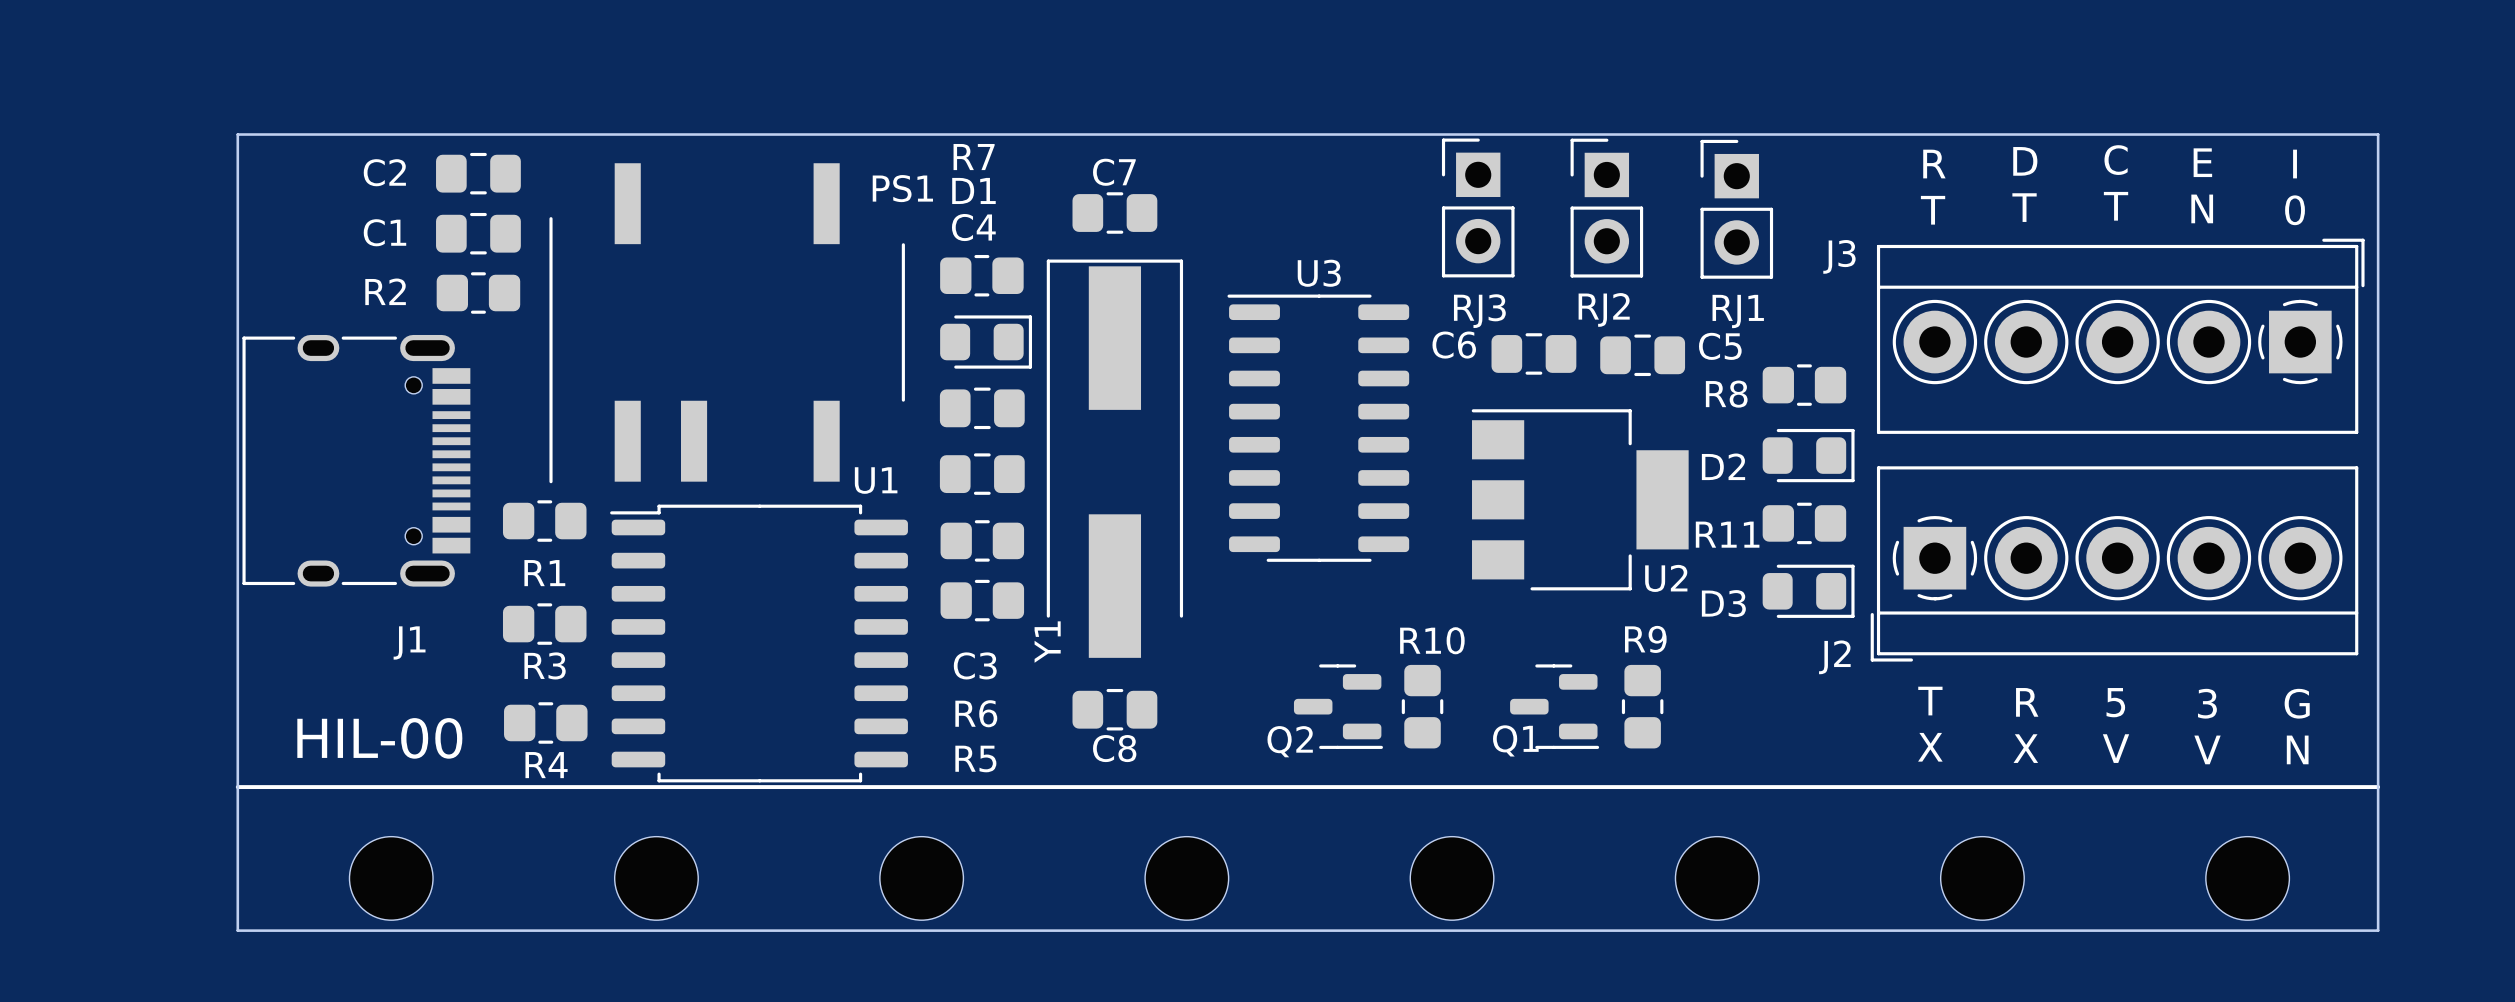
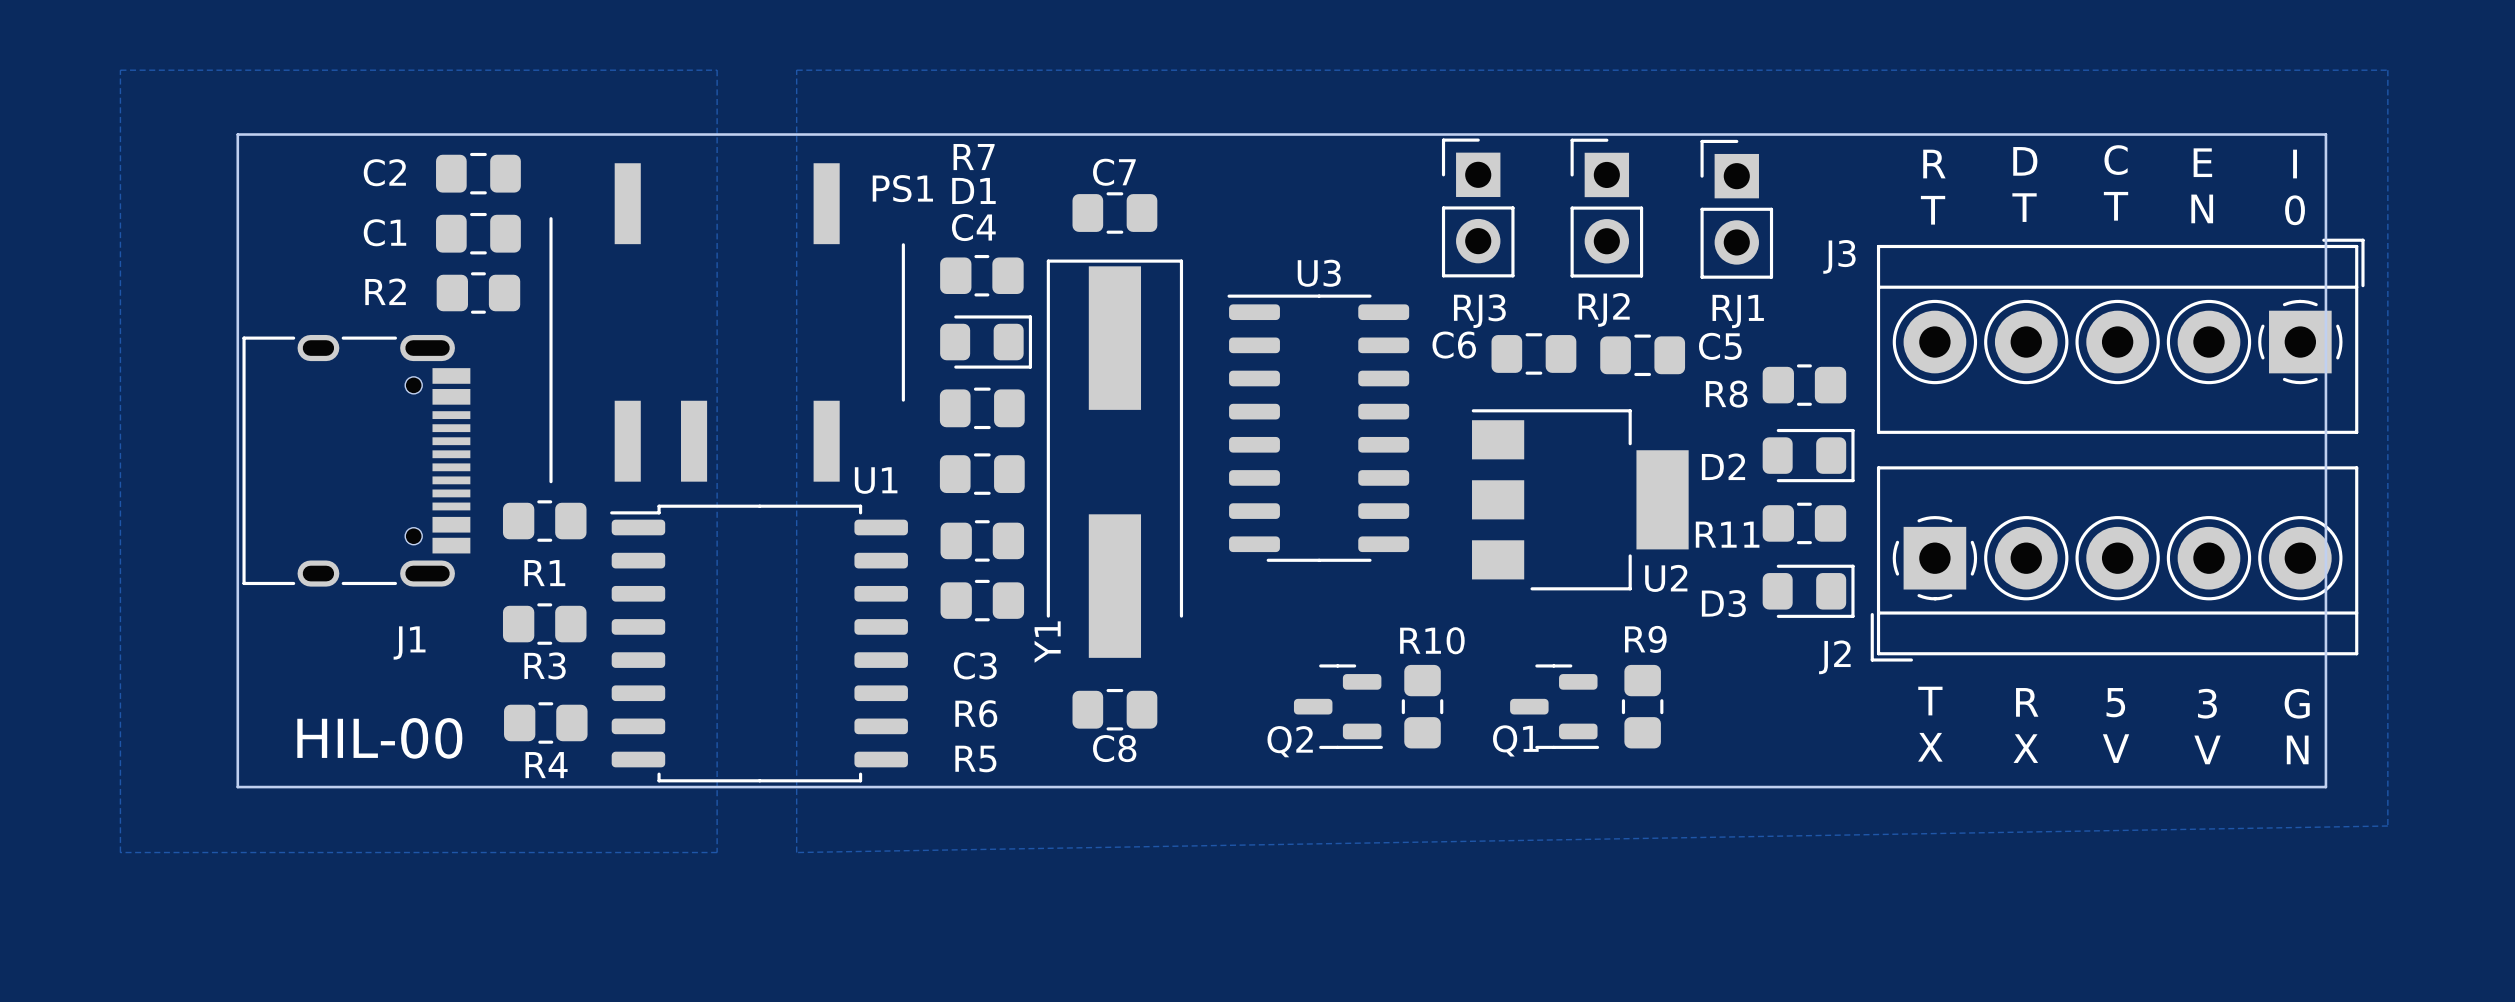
zone outline: none -> (120, 70) (120, 852) (717, 852) (717, 70) (120, 70)
zone outline: none -> (796, 70) (2387, 70) (2387, 826) (796, 852) (796, 70)
board edge: (2325, 134) (2378, 134) (2378, 930) (237, 930) (237, 787) -> (2325, 134) (2325, 787) (237, 787)
line: (237, 787) (2378, 787) -> none
part: (391, 878) -> none
part: (656, 878) -> none
part: (921, 878) -> none
part: (1186, 878) -> none
part: (1452, 878) -> none
part: (1717, 878) -> none
part: (1982, 878) -> none
part: (2247, 878) -> none

